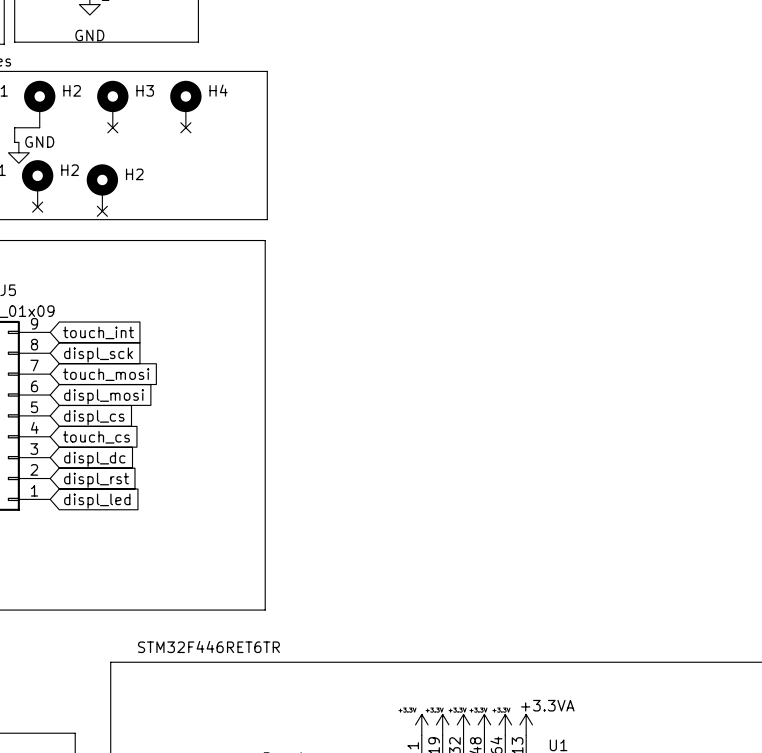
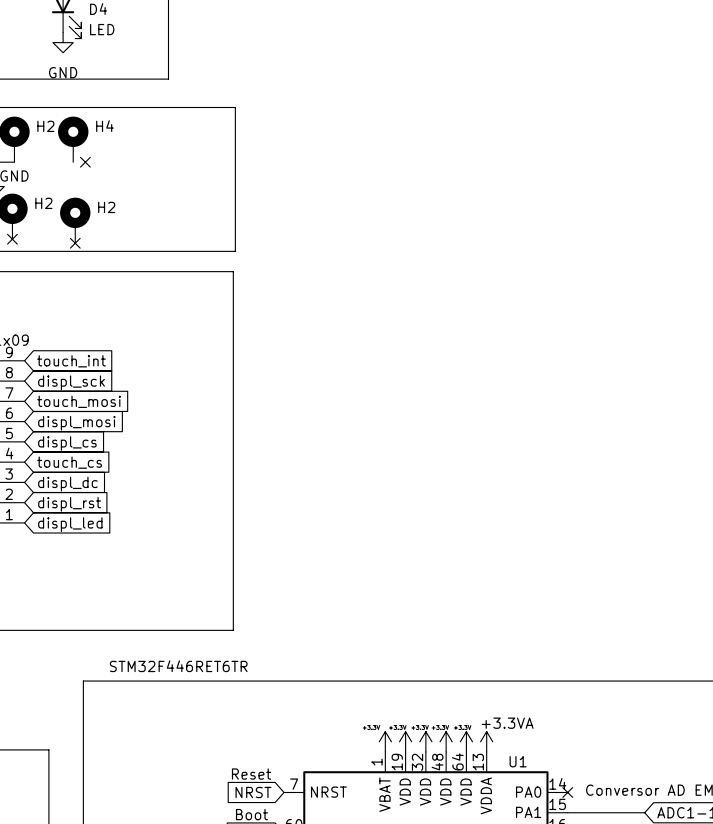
H3: (112, 104) -> none
H4 position: (185, 104) -> (73, 139)
no-connect mark: (185, 127) -> none

